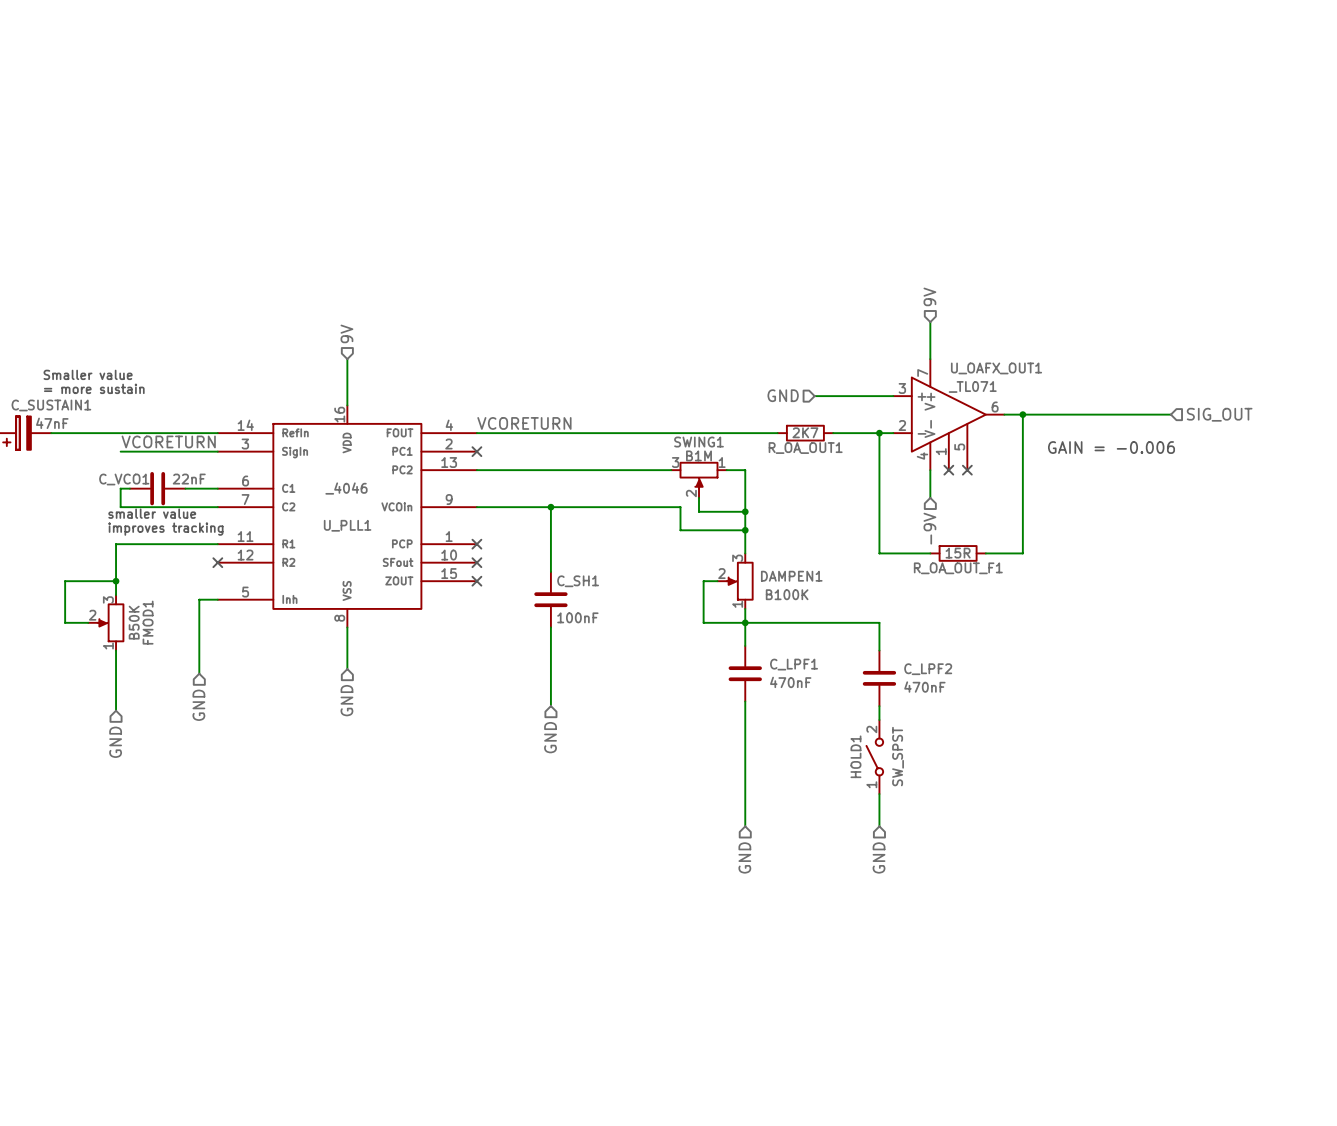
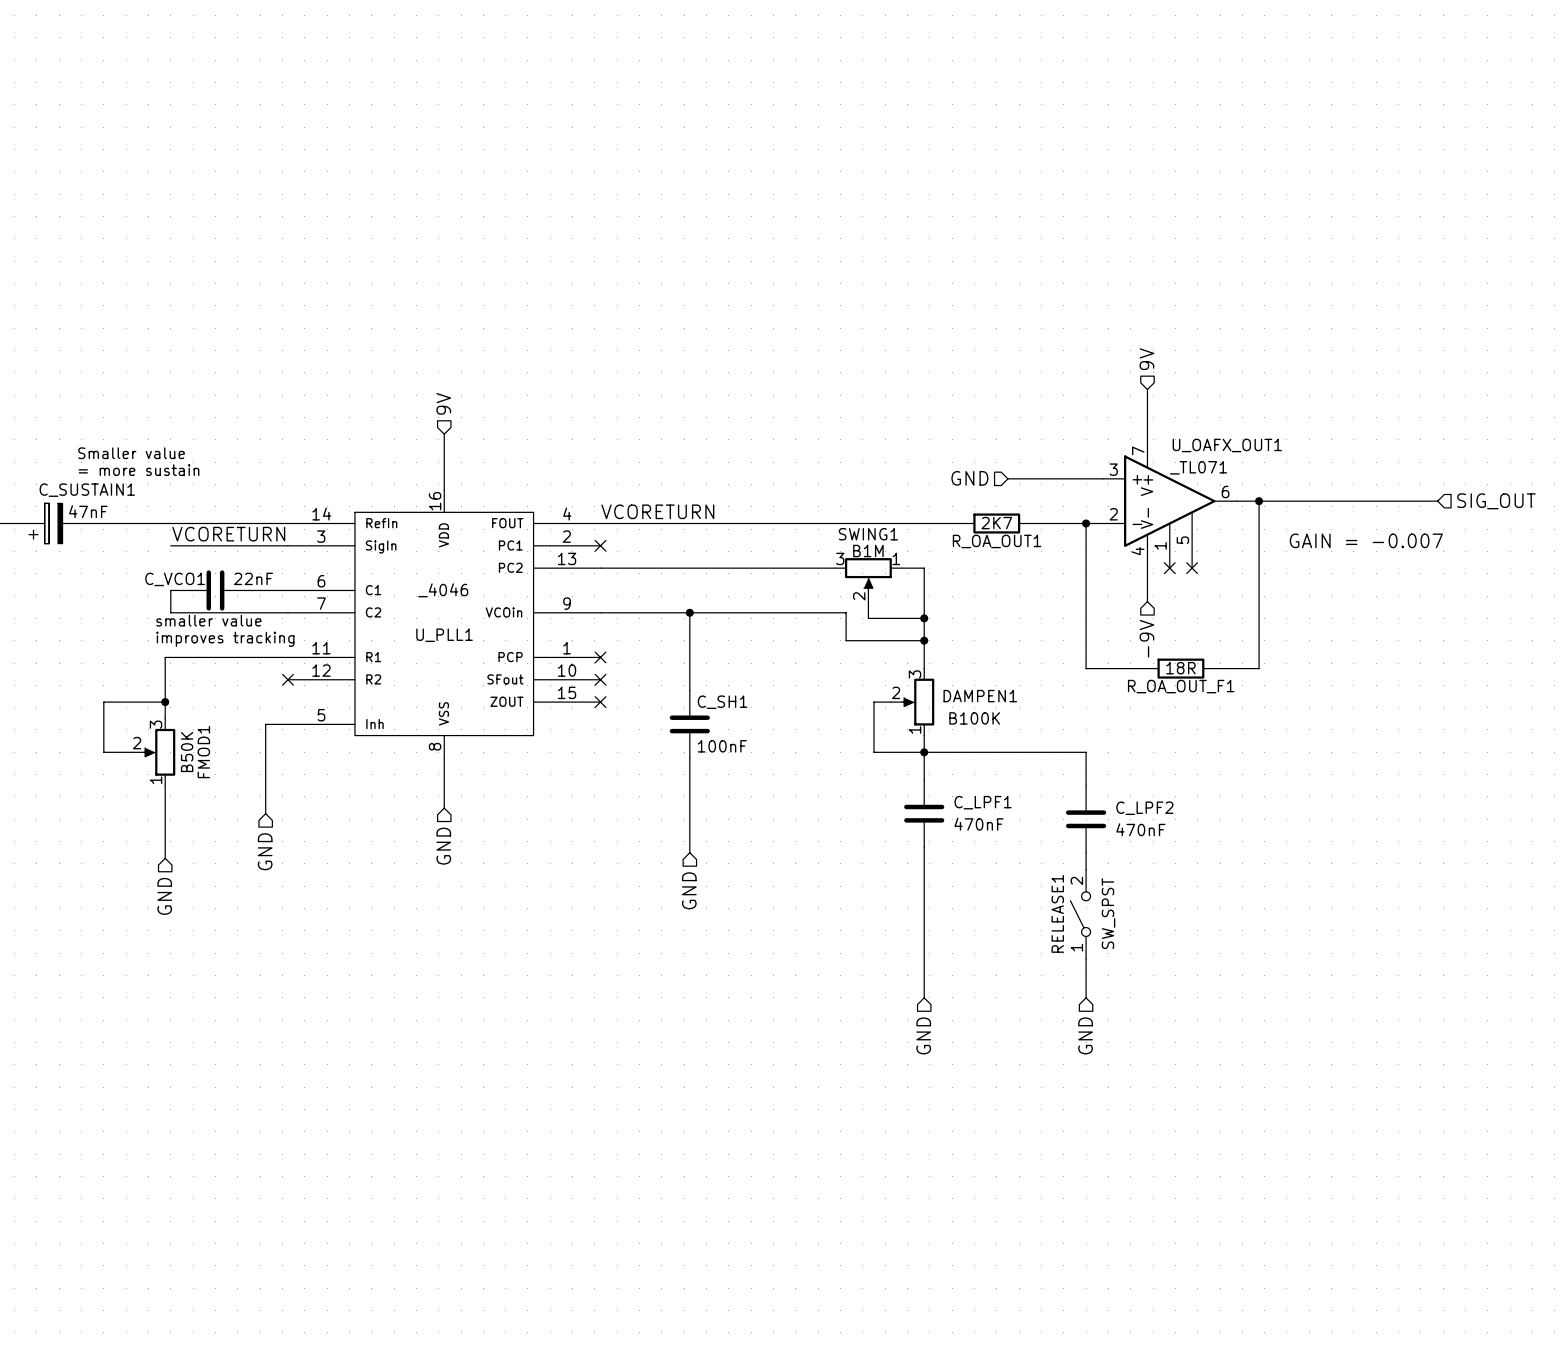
text: GAIN = -0.006 (1111, 447) -> GAIN = -0.007 (1366, 540)
R_OA_OUT_F1 value: 15R (958, 553) -> 18R (1180, 668)
HOLD1 name: HOLD1 (855, 756) -> RELEASE1 (1057, 913)

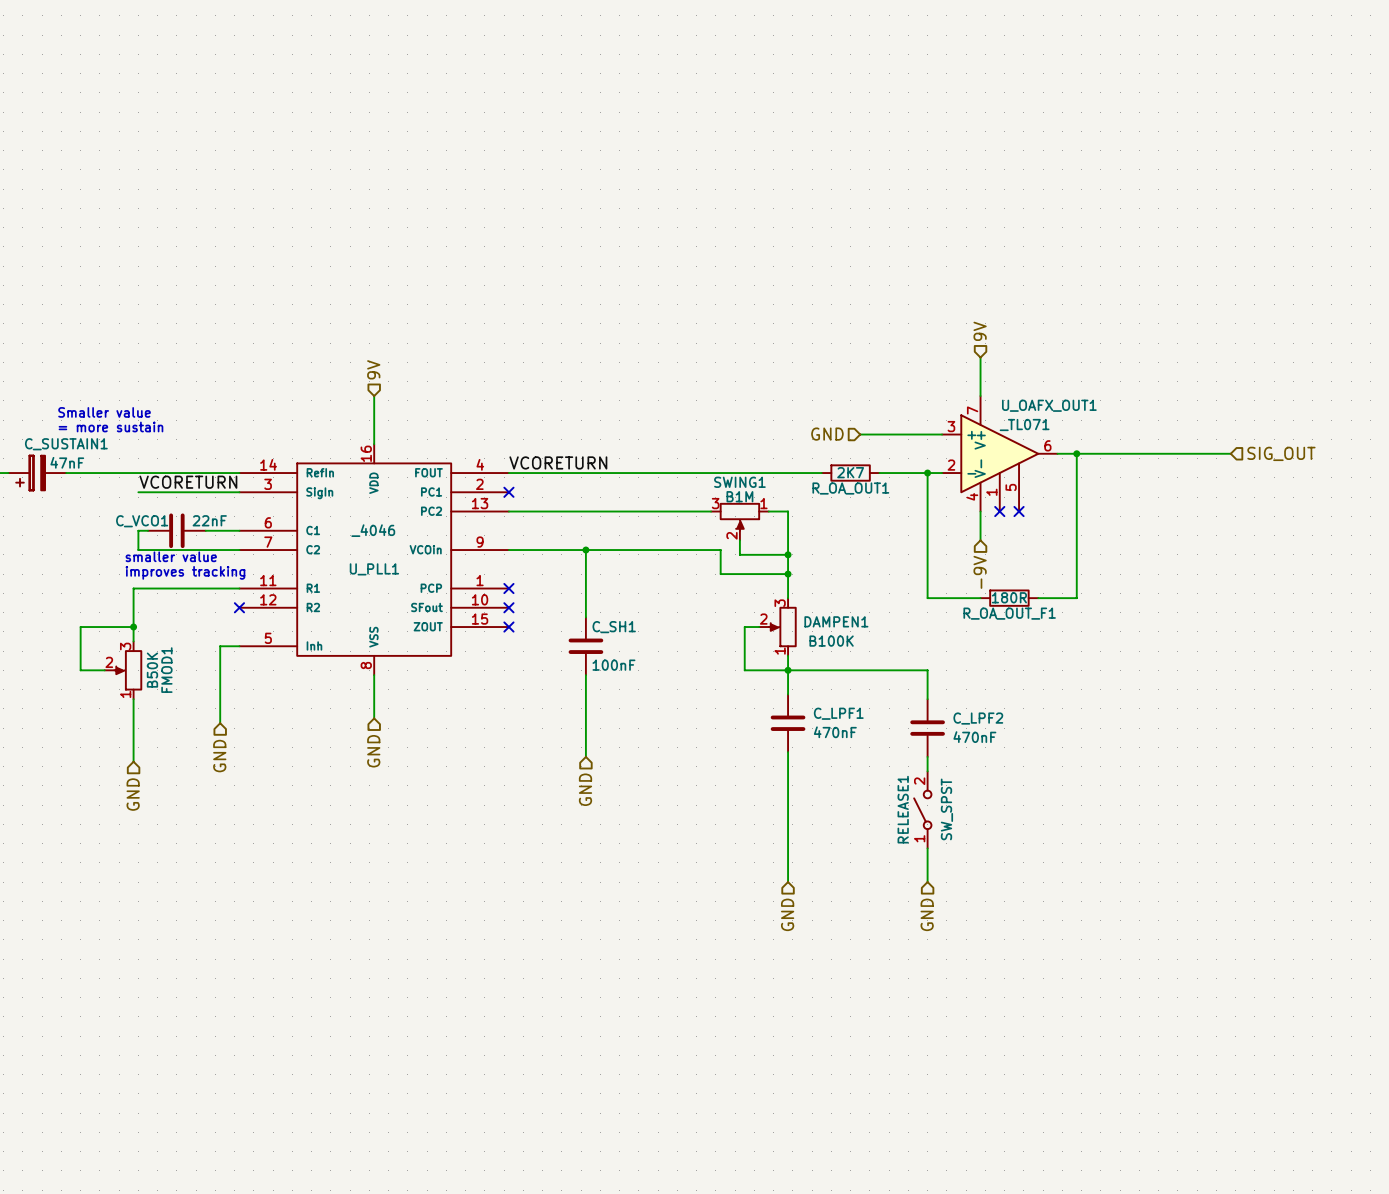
text: GAIN = -0.007 (1366, 540) -> none
R_OA_OUT_F1 value: 18R (1180, 668) -> 180R (1009, 597)

